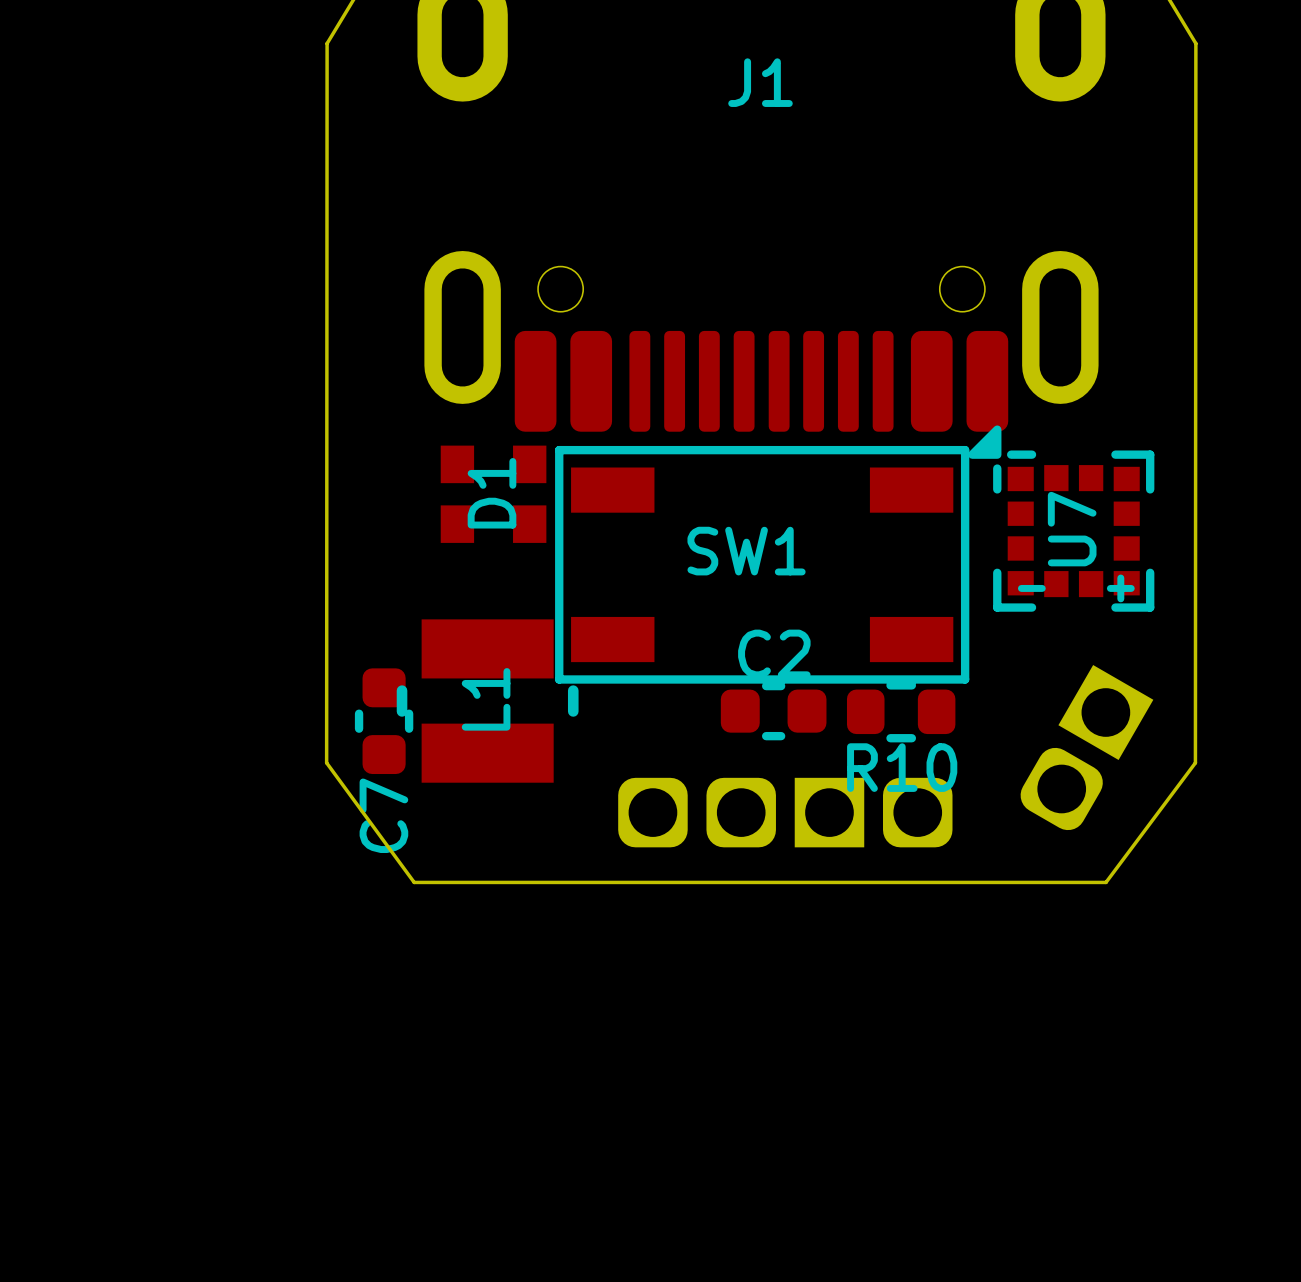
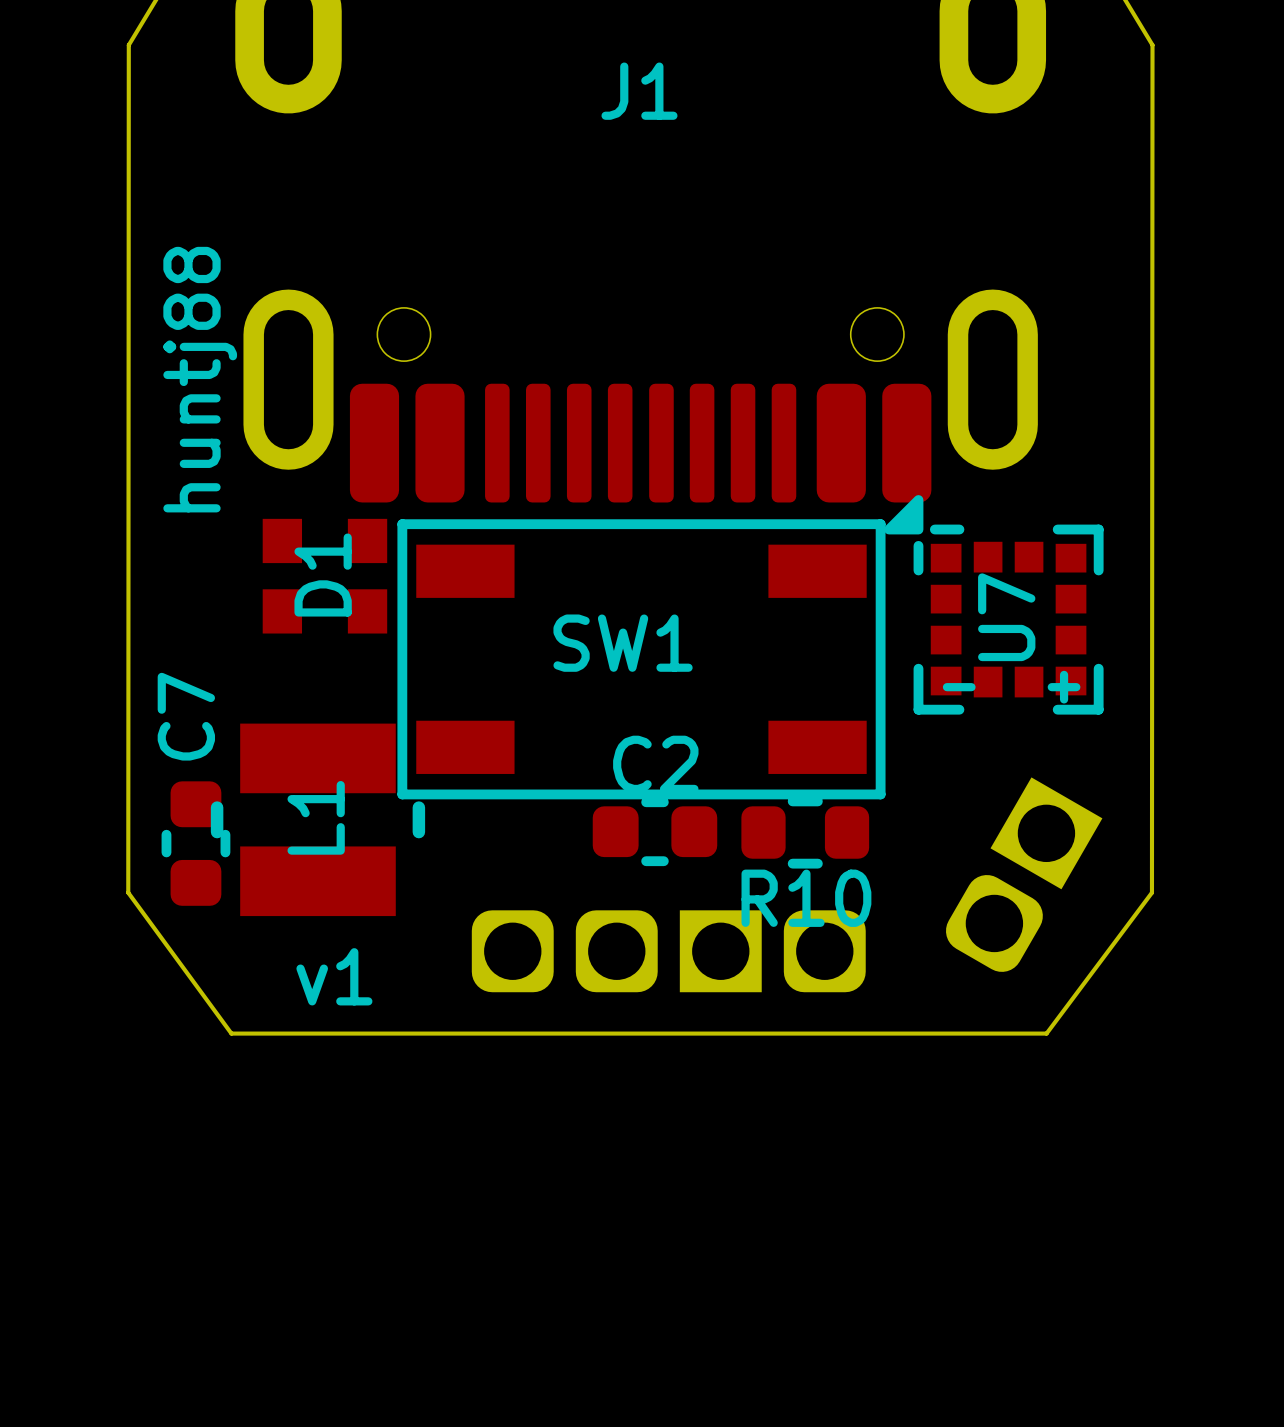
text: none -> huntj88 (200, 379)
C7 name position: C7 (383, 815) -> C7 (186, 716)
text: none -> v1 (334, 976)

